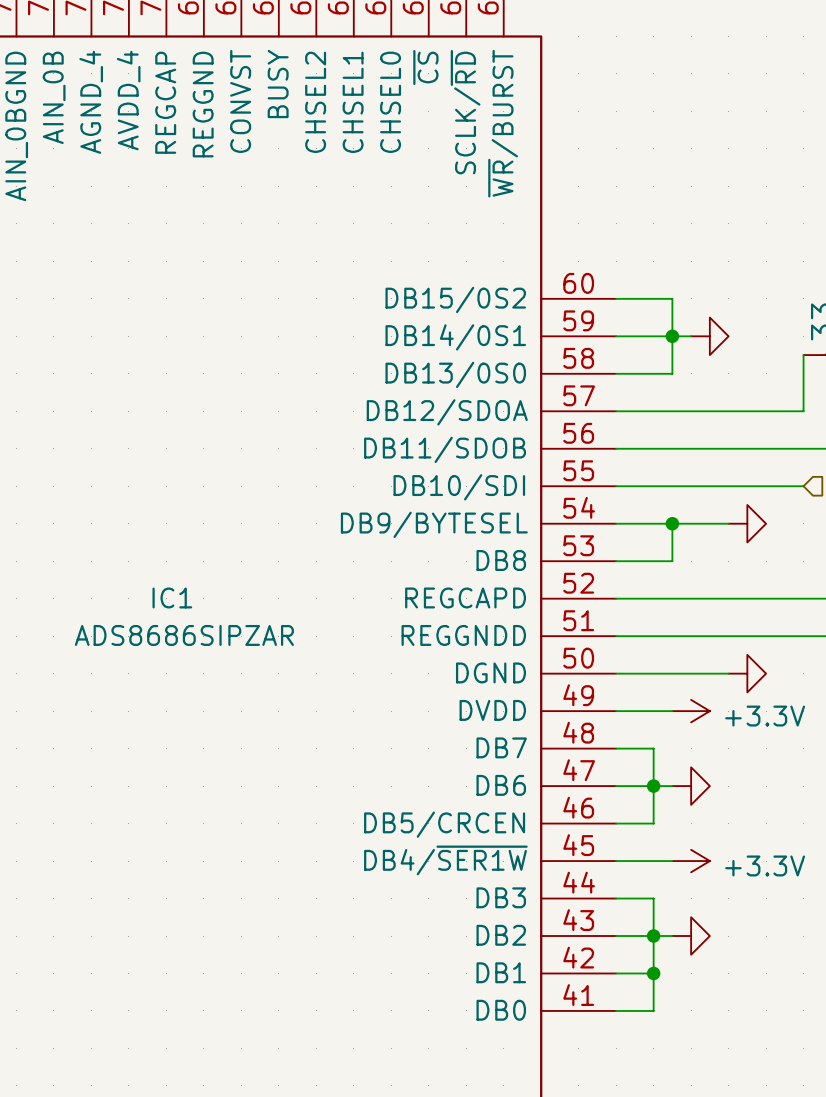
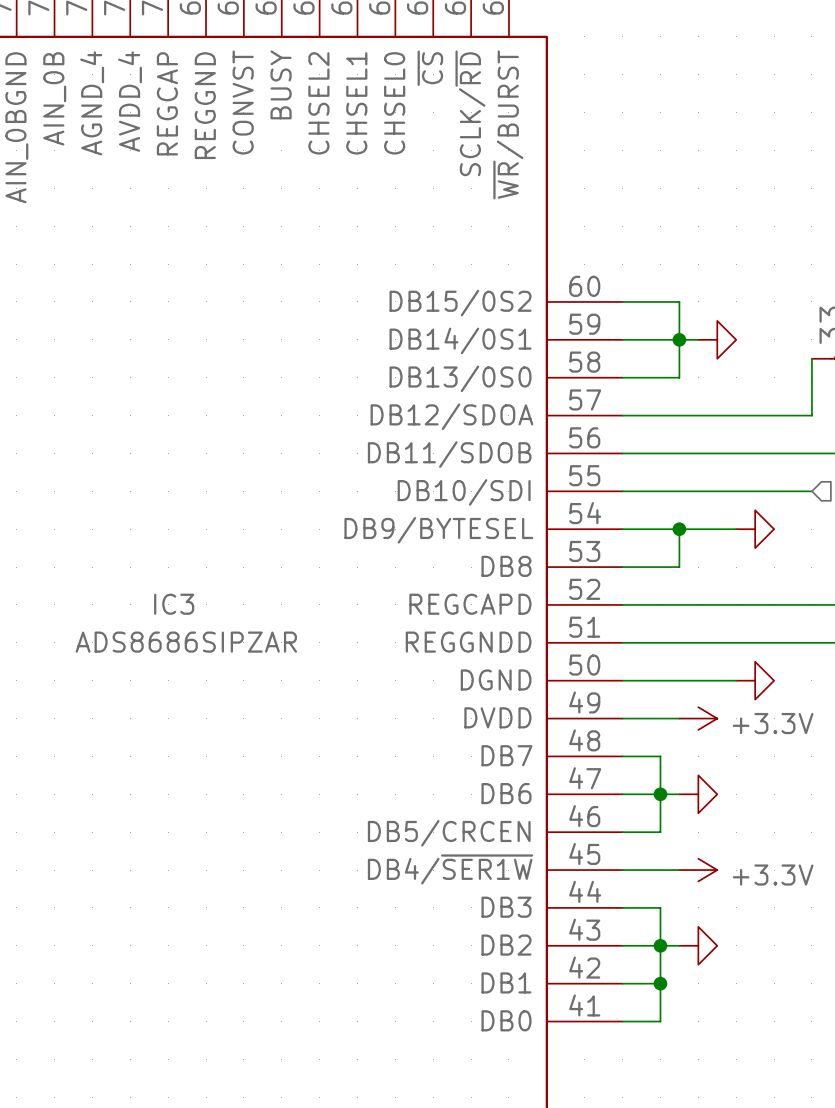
IC1 name: IC1 (172, 597) -> IC3 (174, 604)

